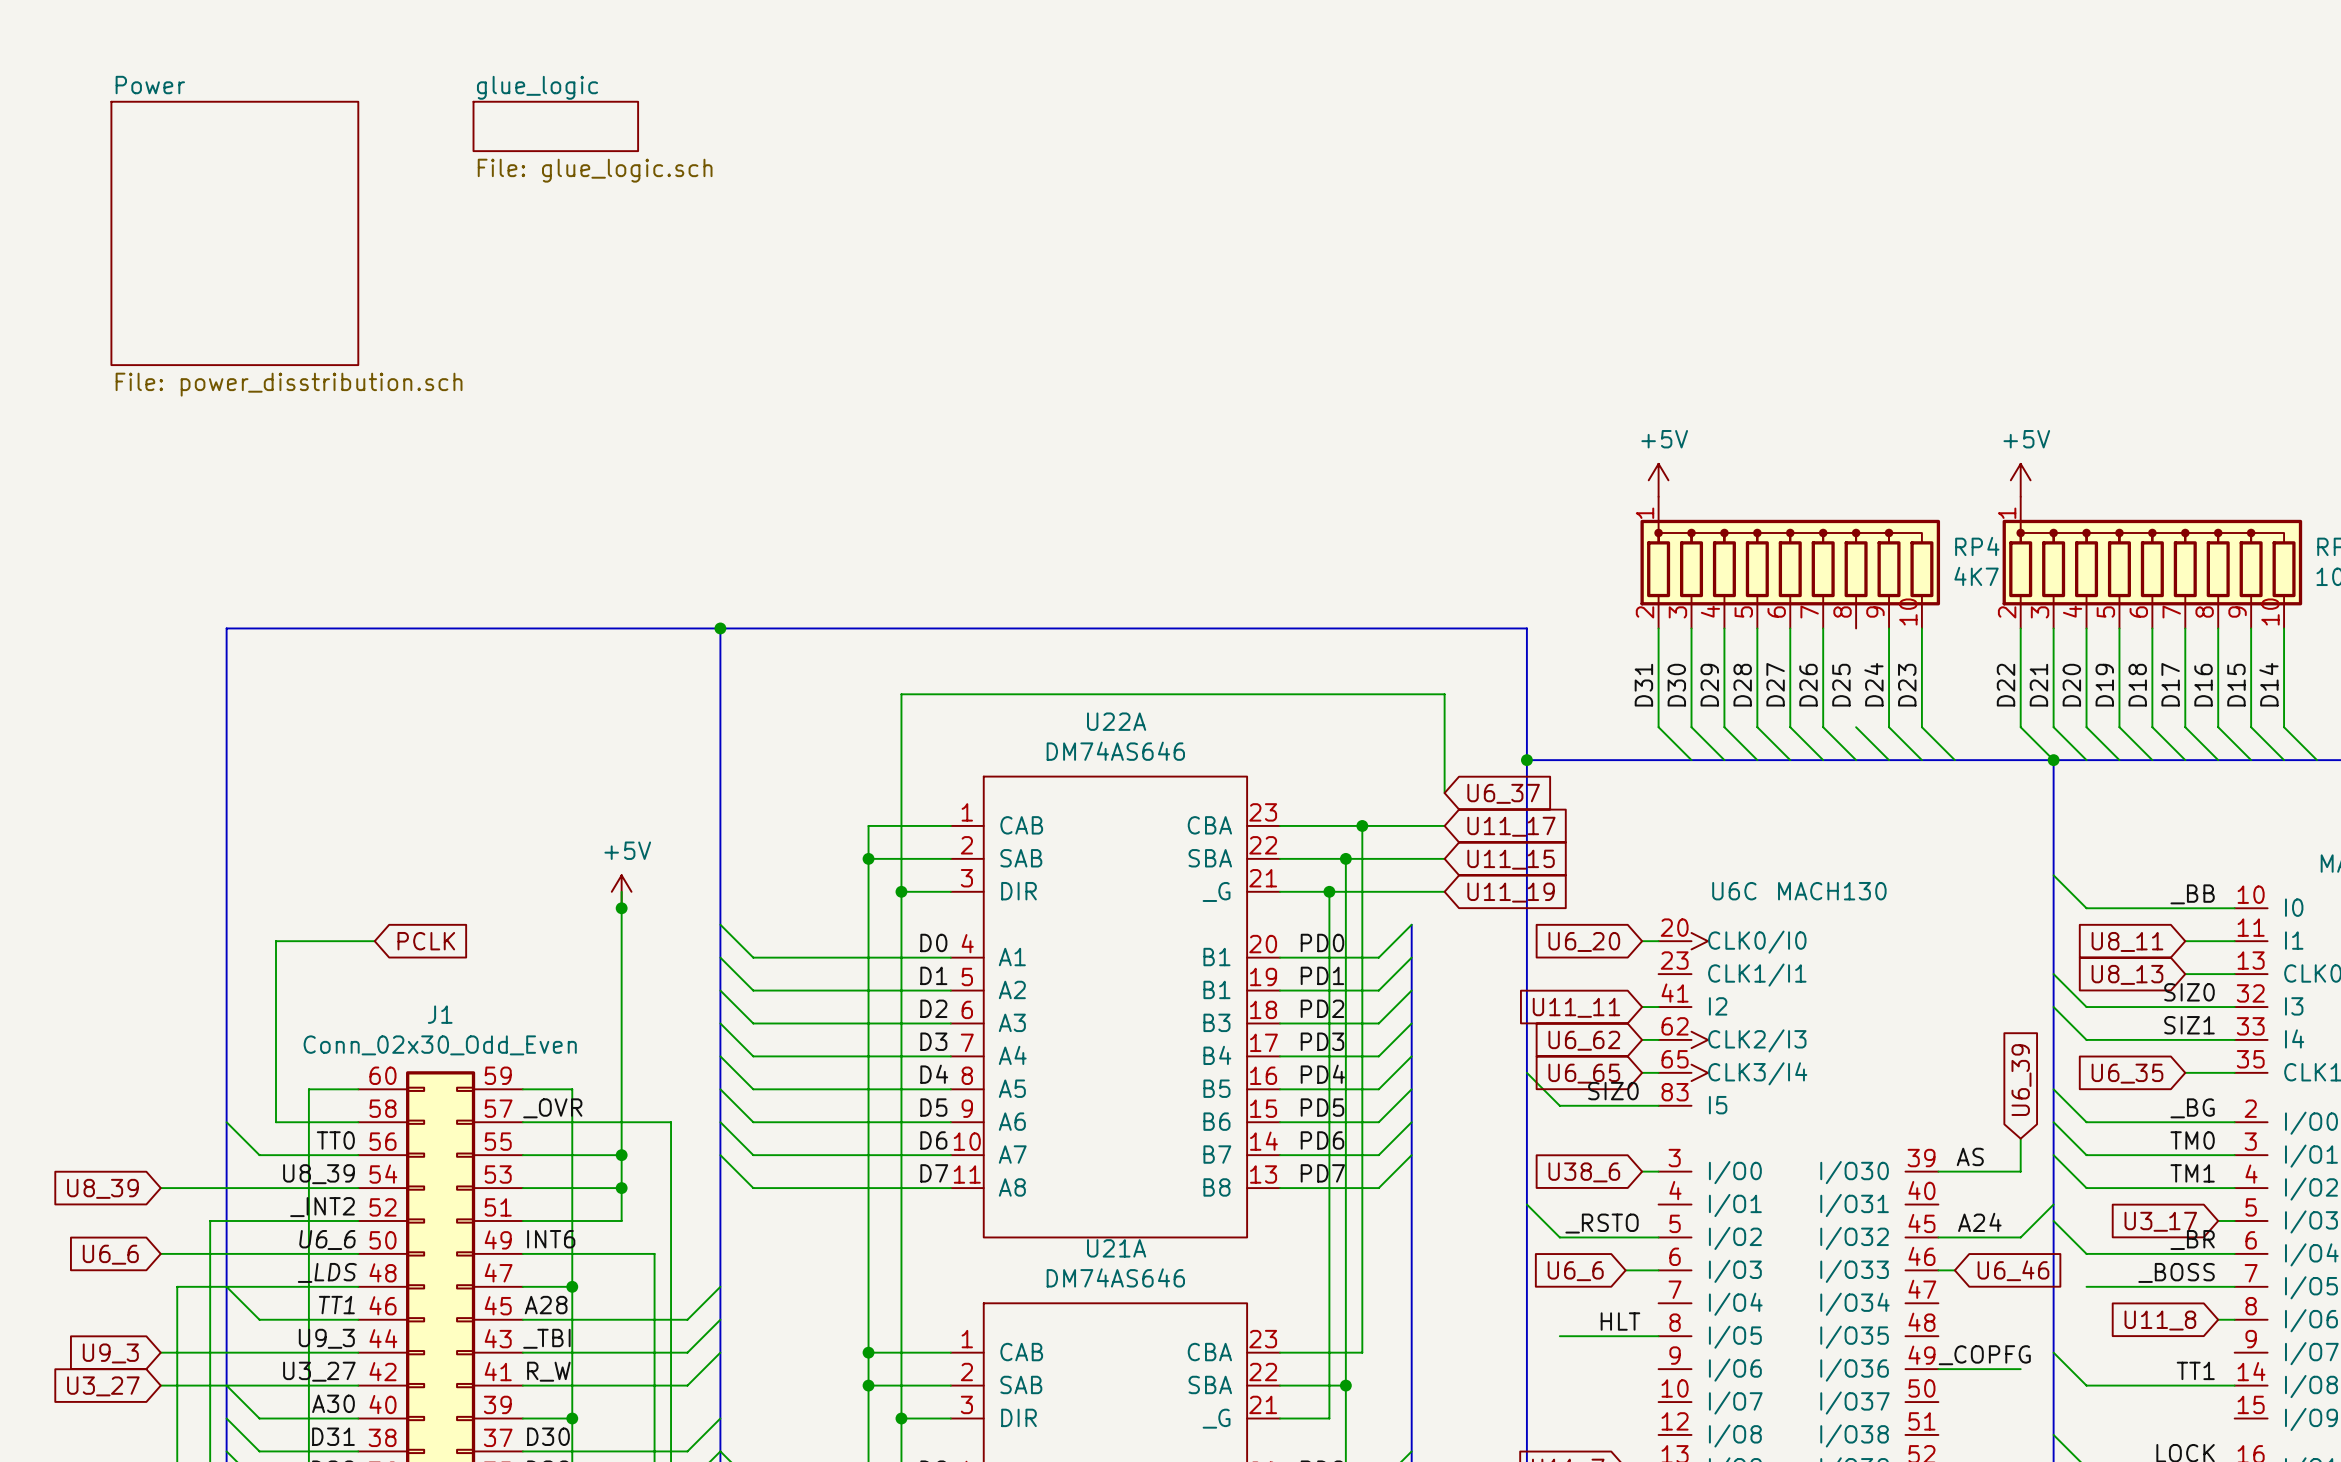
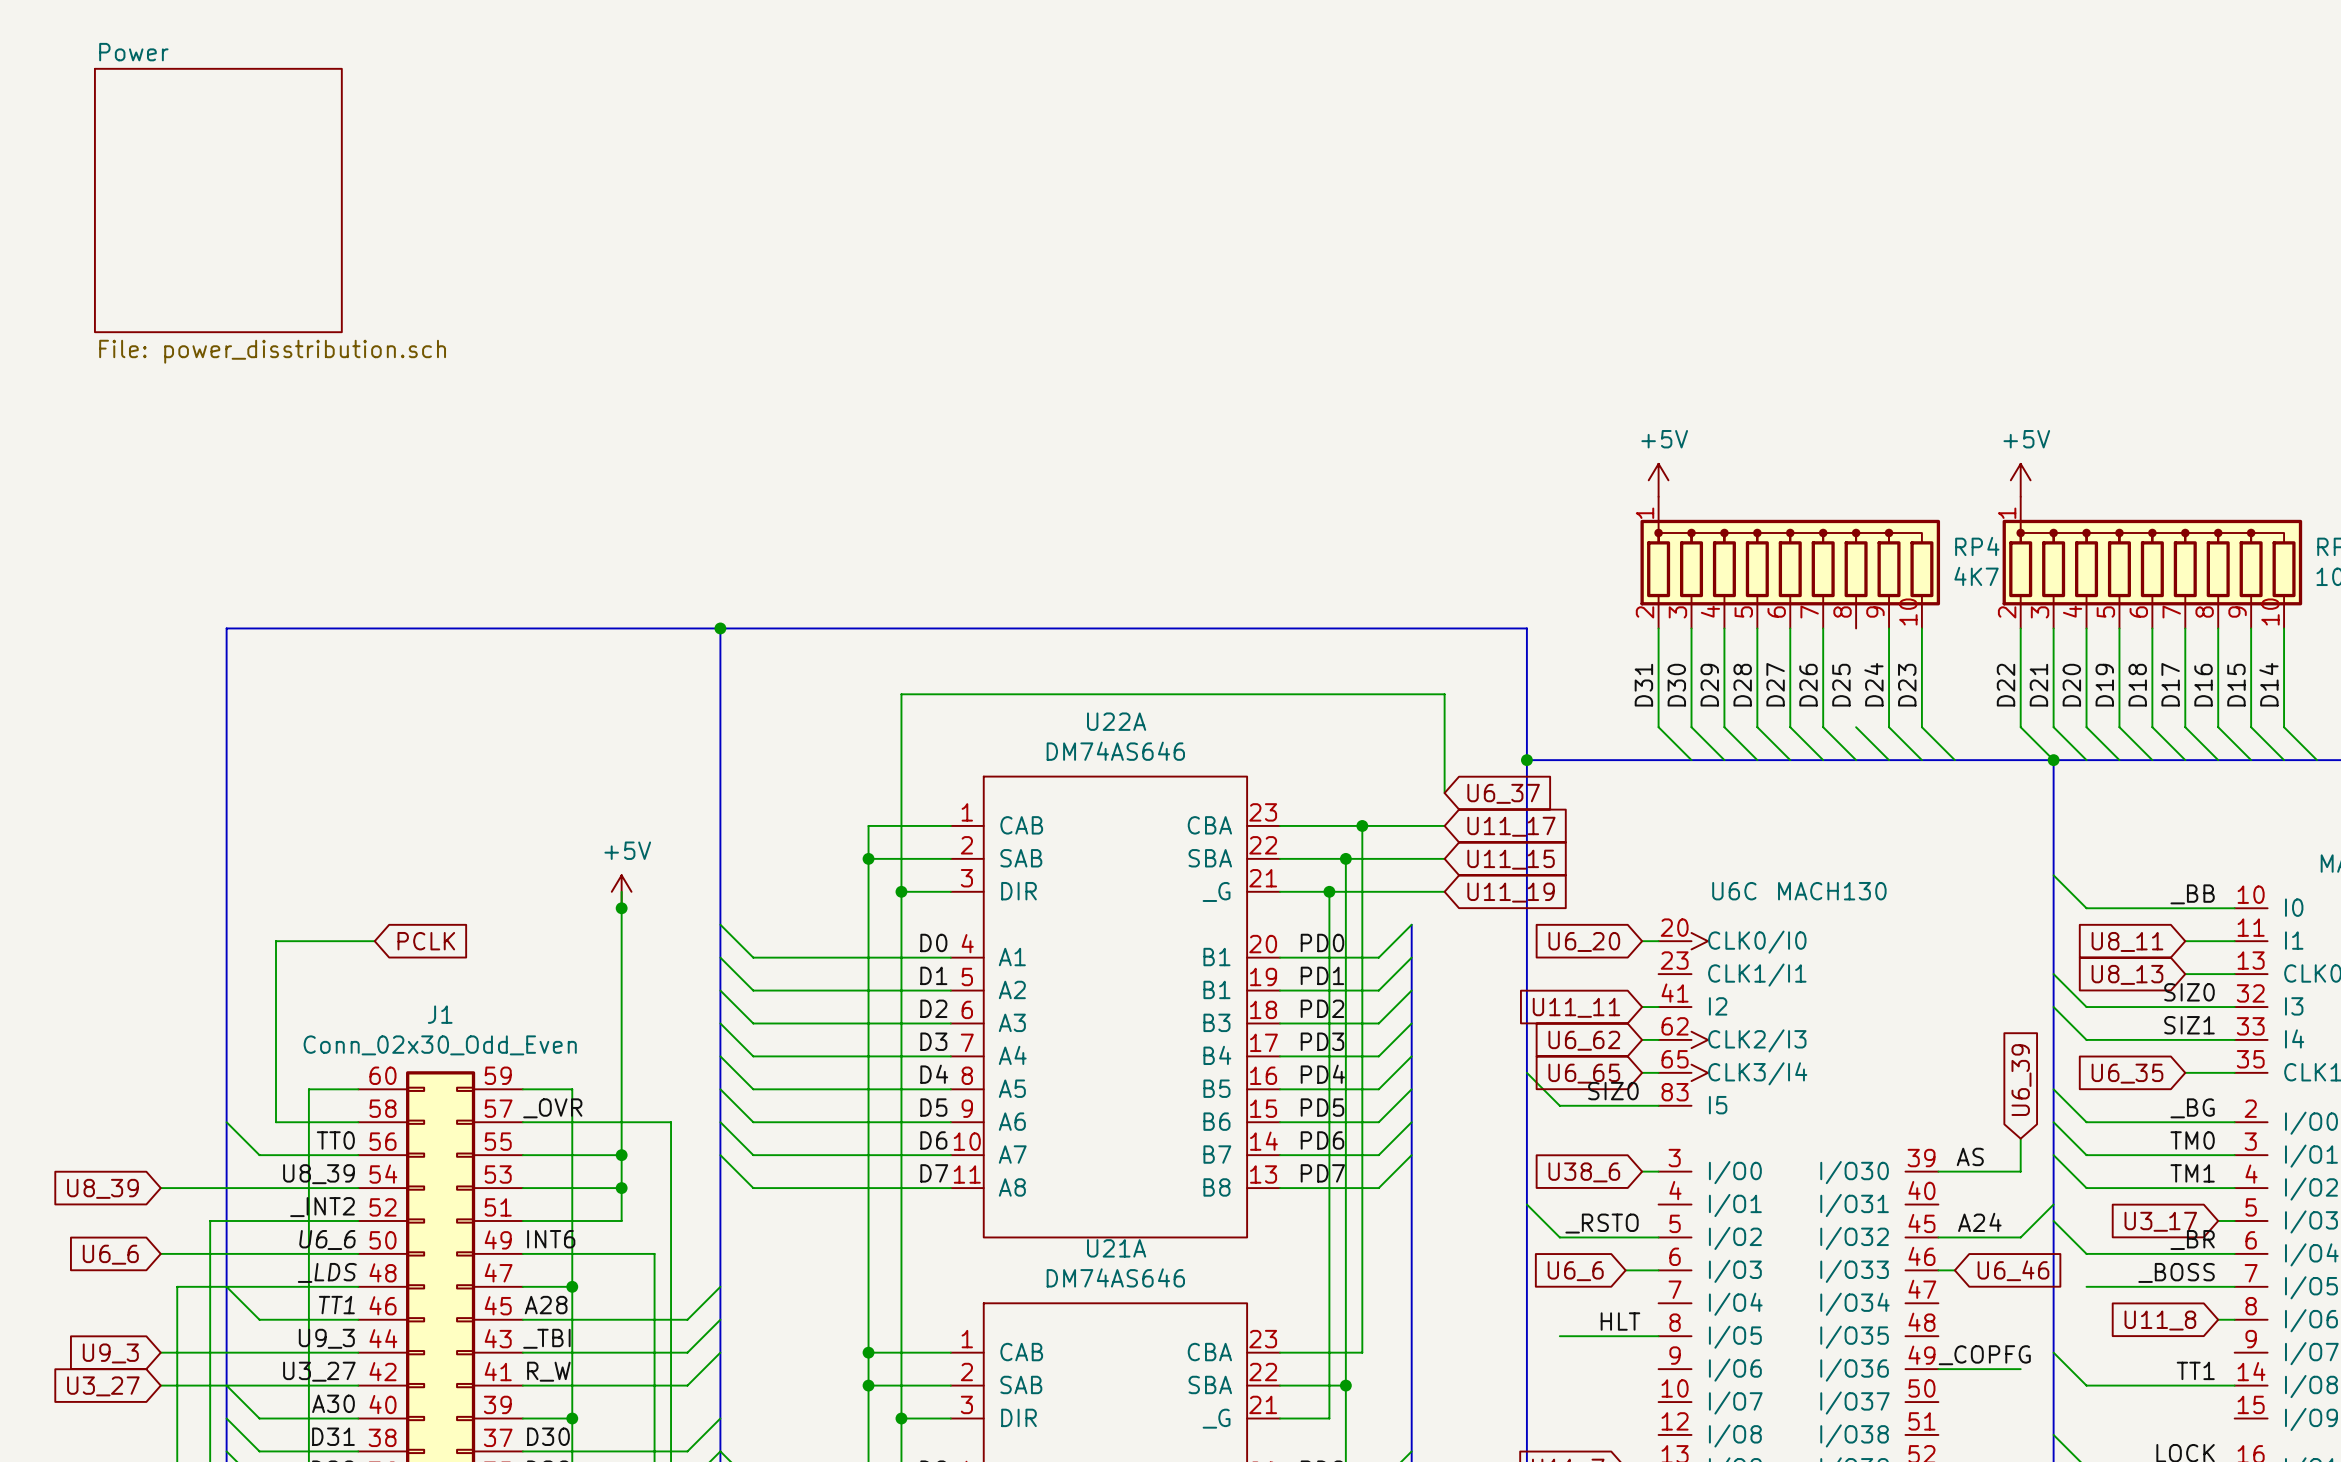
sheet glue_logic: File: glue_logic.sch (555, 126) -> none
sheet Power position: (234, 233) -> (218, 200)

